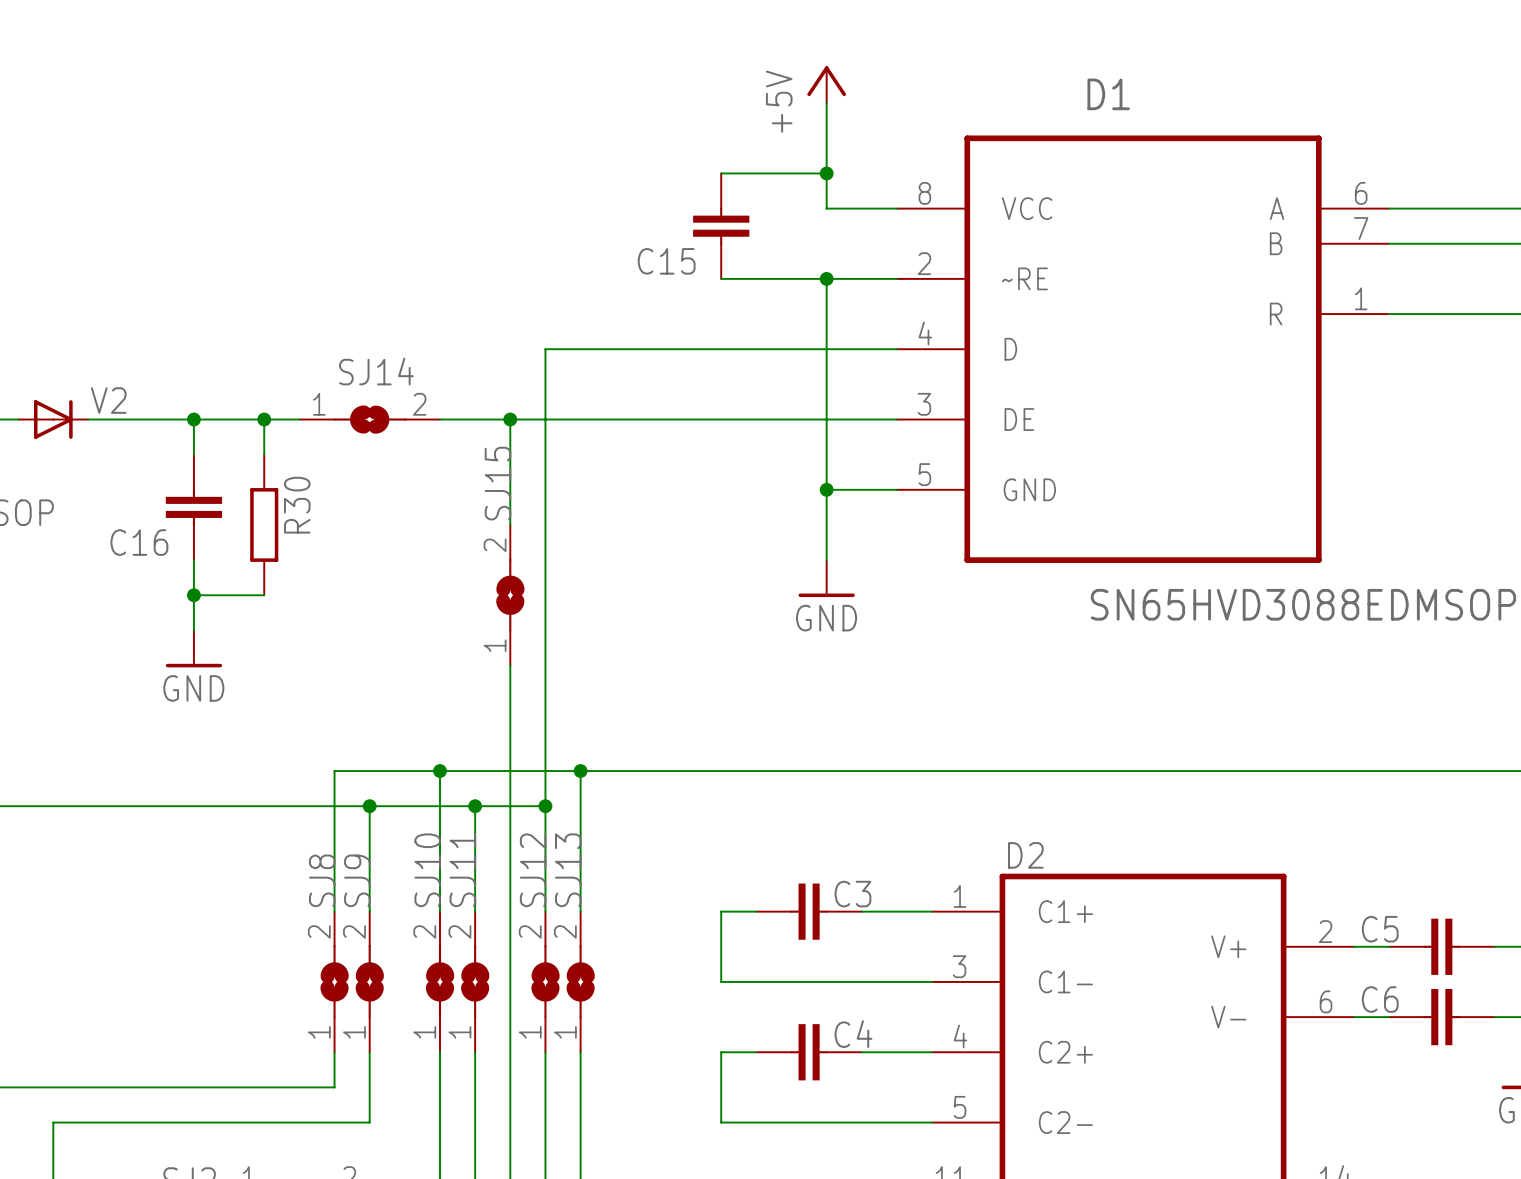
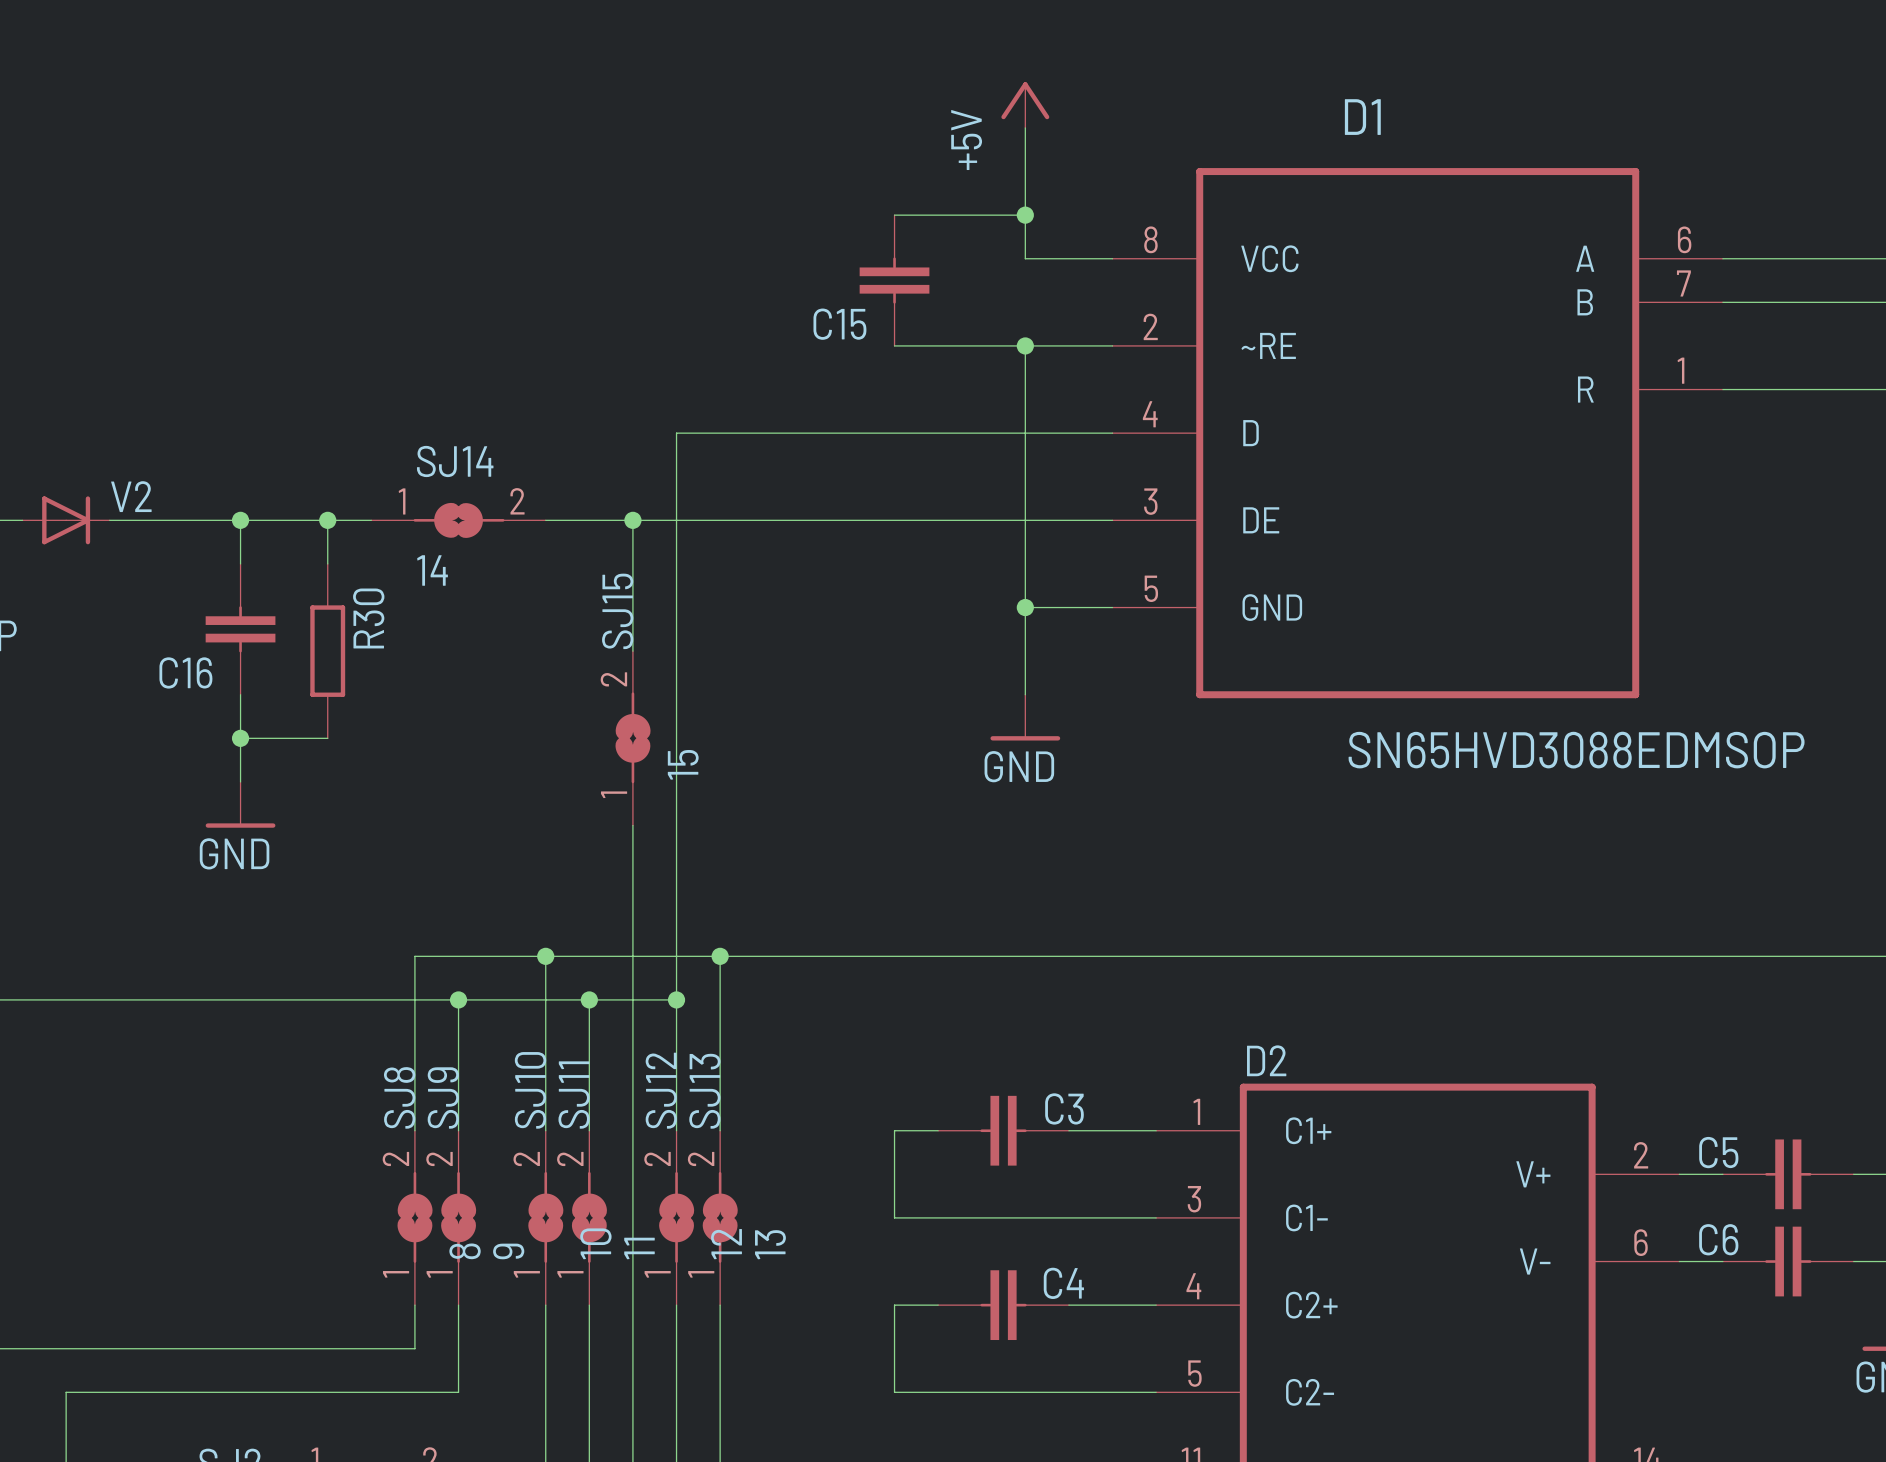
SJ14 value: none -> 14 (432, 570)
SJ15 value: none -> 15 (683, 764)
SJ10 value: none -> 10 (595, 1243)
SJ11 value: none -> 11 (639, 1248)
SJ12 value: none -> 12 (726, 1244)
SJ13 value: none -> 13 (770, 1244)
SJ8 value: none -> 8 (465, 1251)
SJ9 value: none -> 9 (508, 1251)

